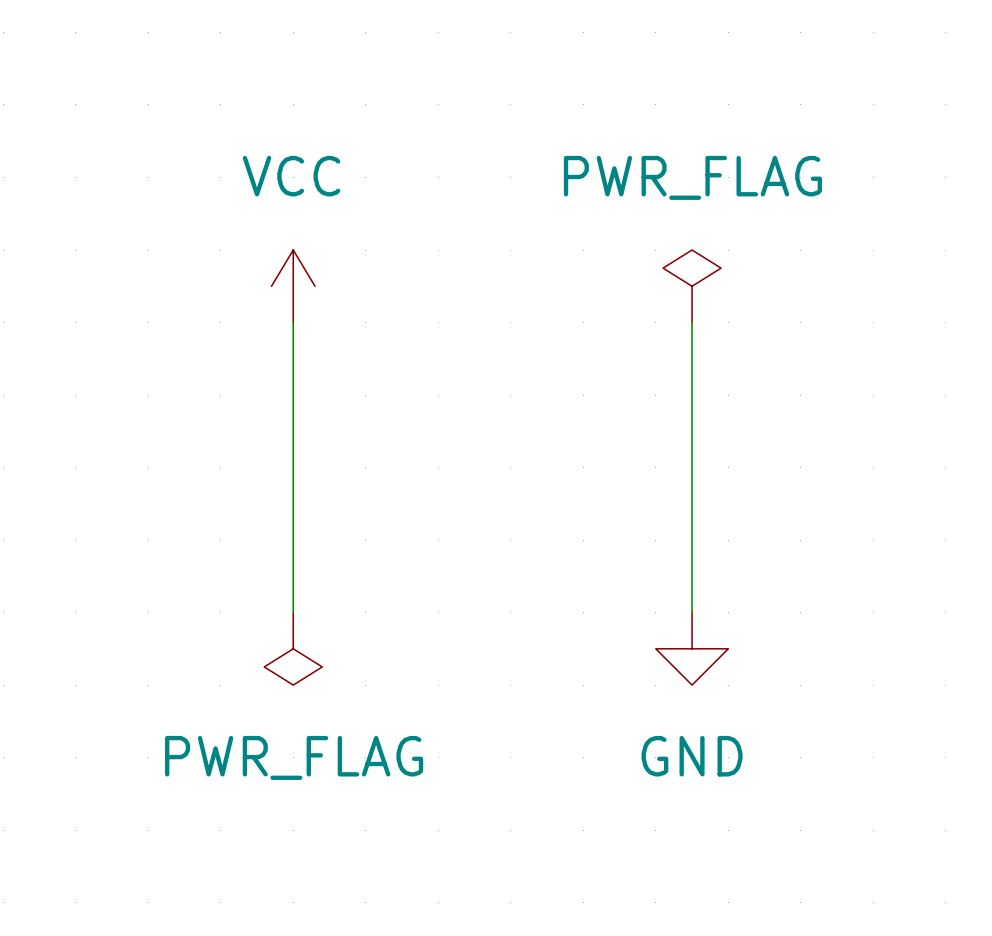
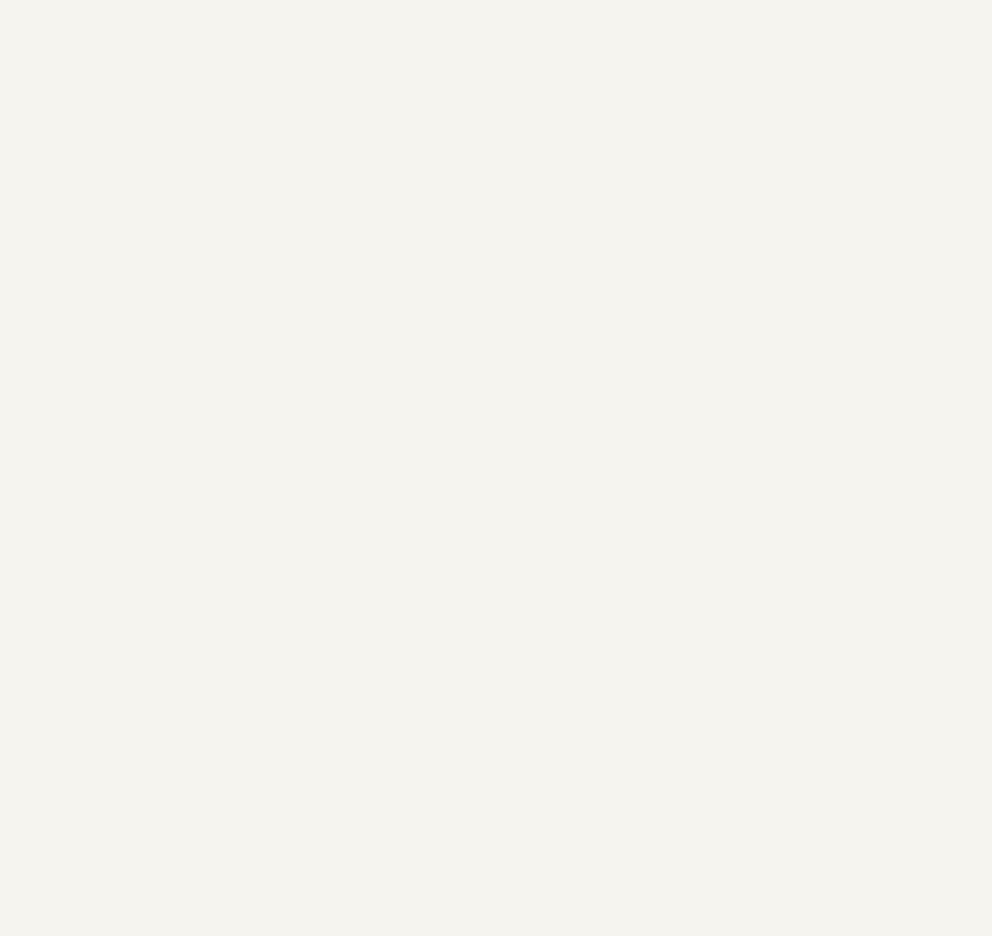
power symbol: VCC (293, 286) -> none
power symbol: PWR_FLAG (692, 286) -> none
wire: (293, 322) (293, 612) -> none
wire: (692, 322) (692, 612) -> none
power symbol: PWR_FLAG (293, 648) -> none
power symbol: GND (692, 648) -> none

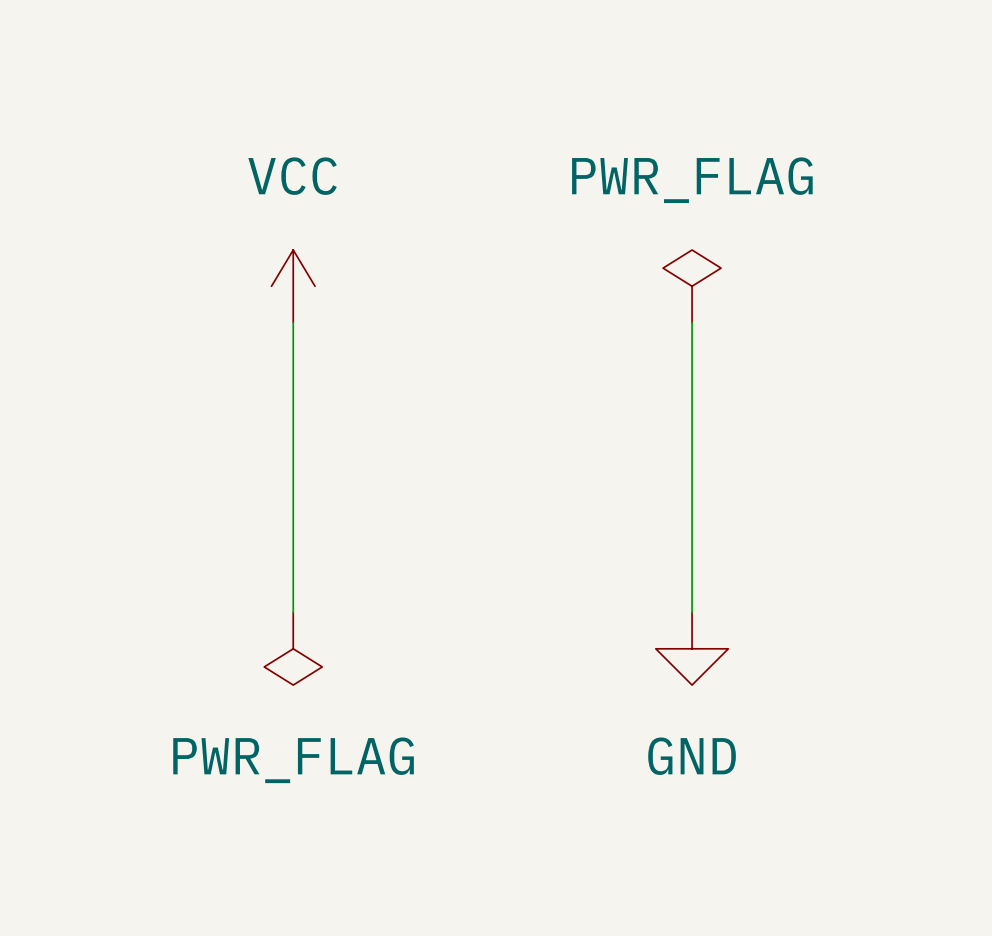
power symbol: none -> VCC (293, 286)
power symbol: none -> PWR_FLAG (692, 286)
wire: none -> (293, 322) (293, 612)
wire: none -> (692, 322) (692, 612)
power symbol: none -> PWR_FLAG (293, 648)
power symbol: none -> GND (692, 648)

